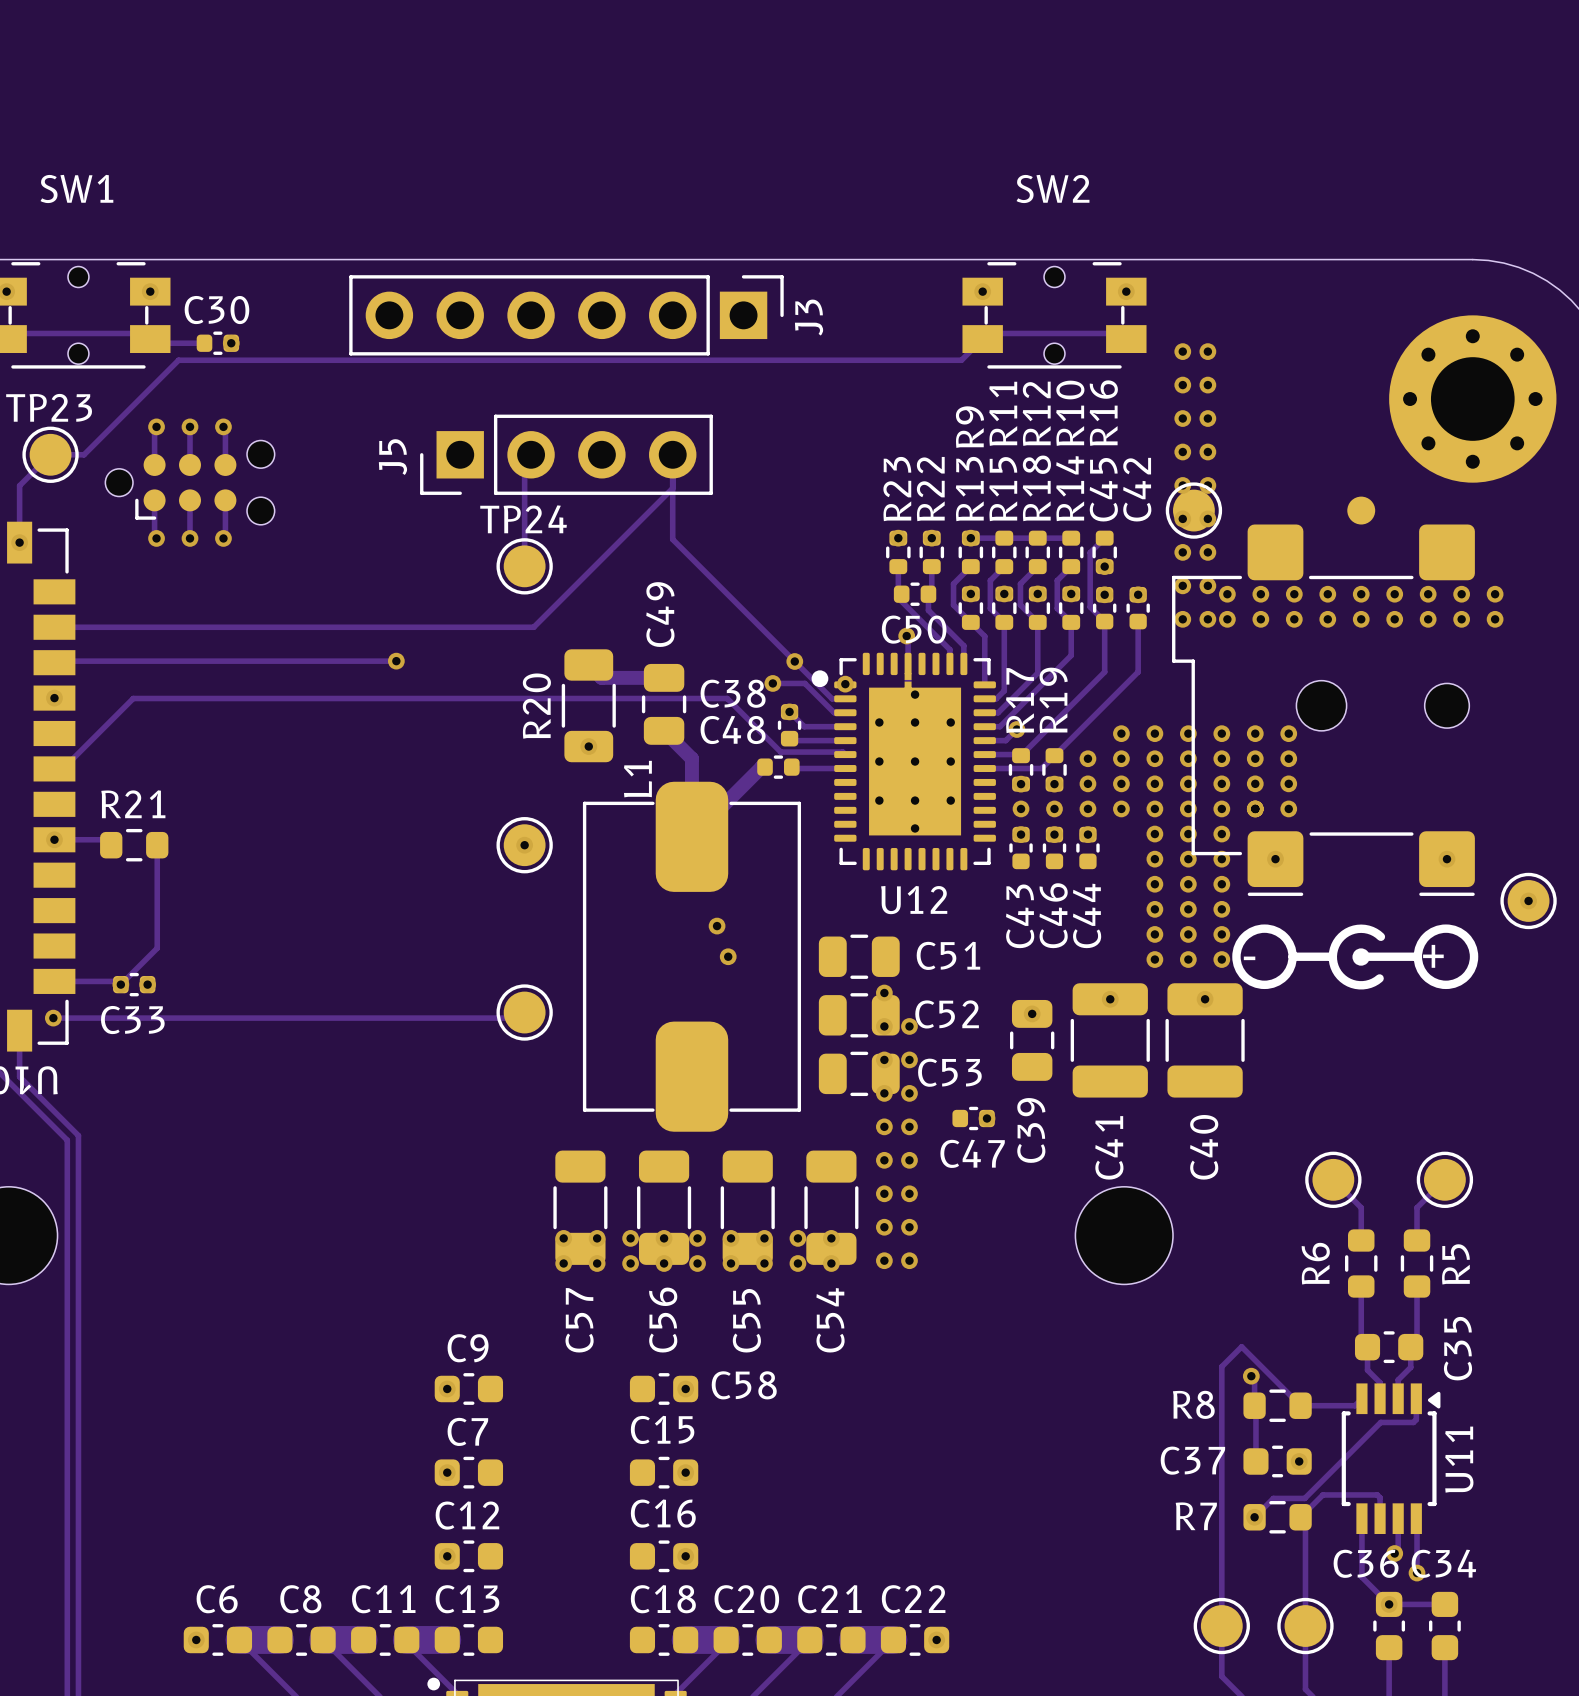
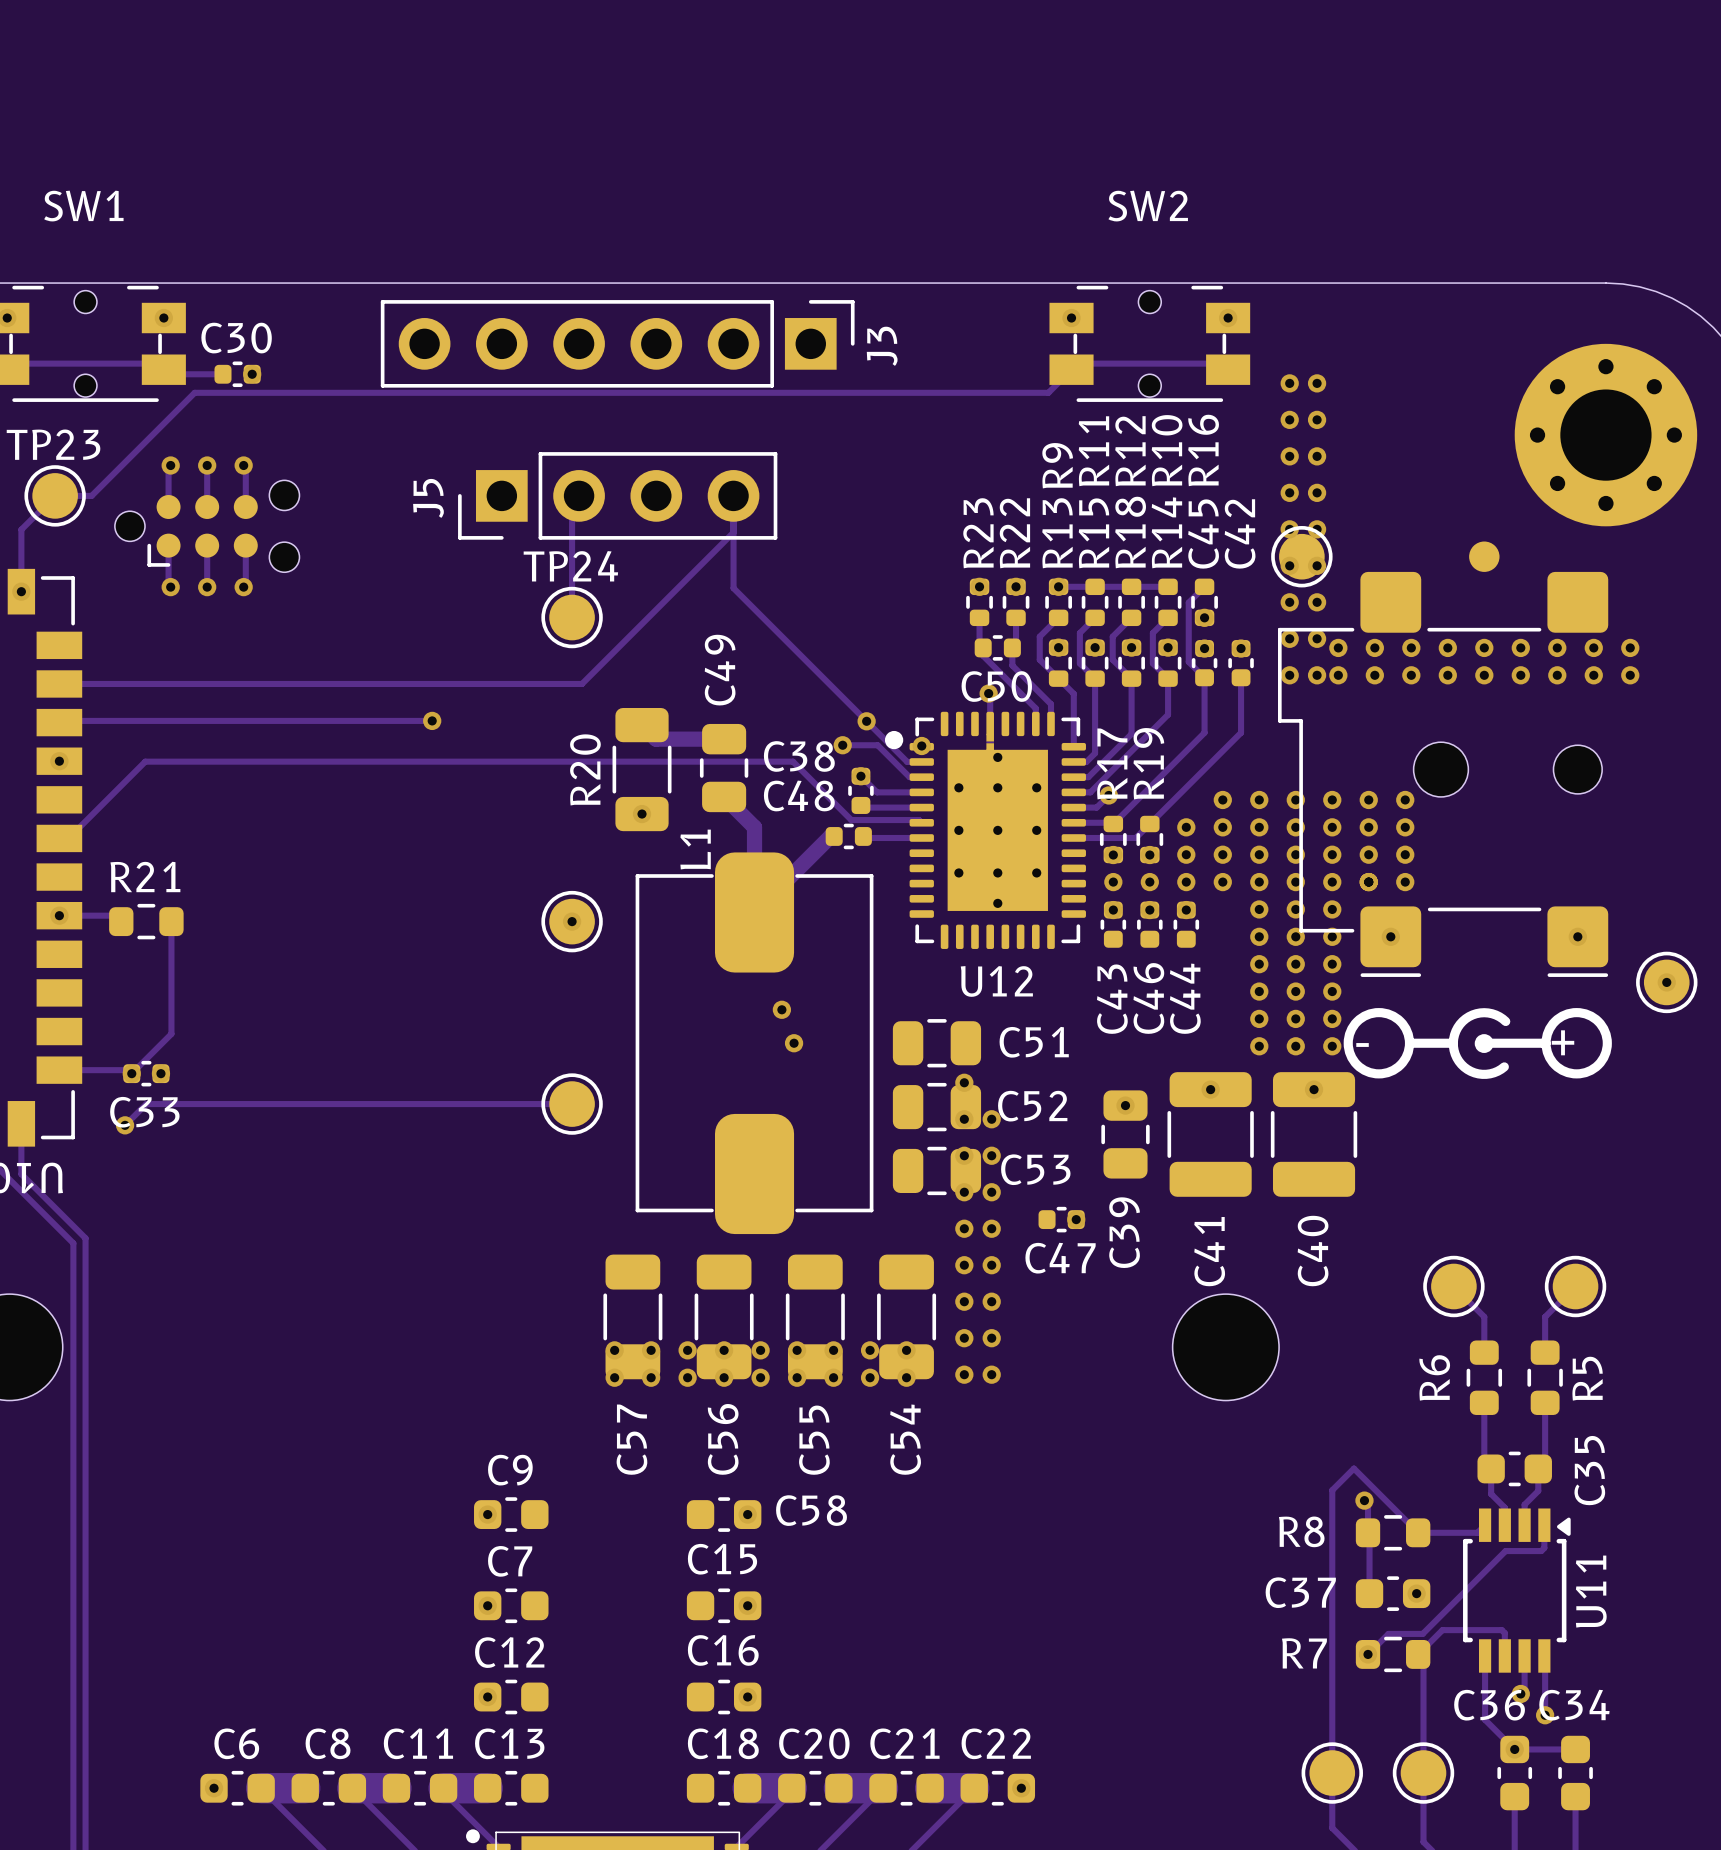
track: (524, 1012) (519, 1018) (53, 1018) -> (572, 1104) (146, 1104) (125, 1125)
via position: (53, 1018) -> (125, 1125)

